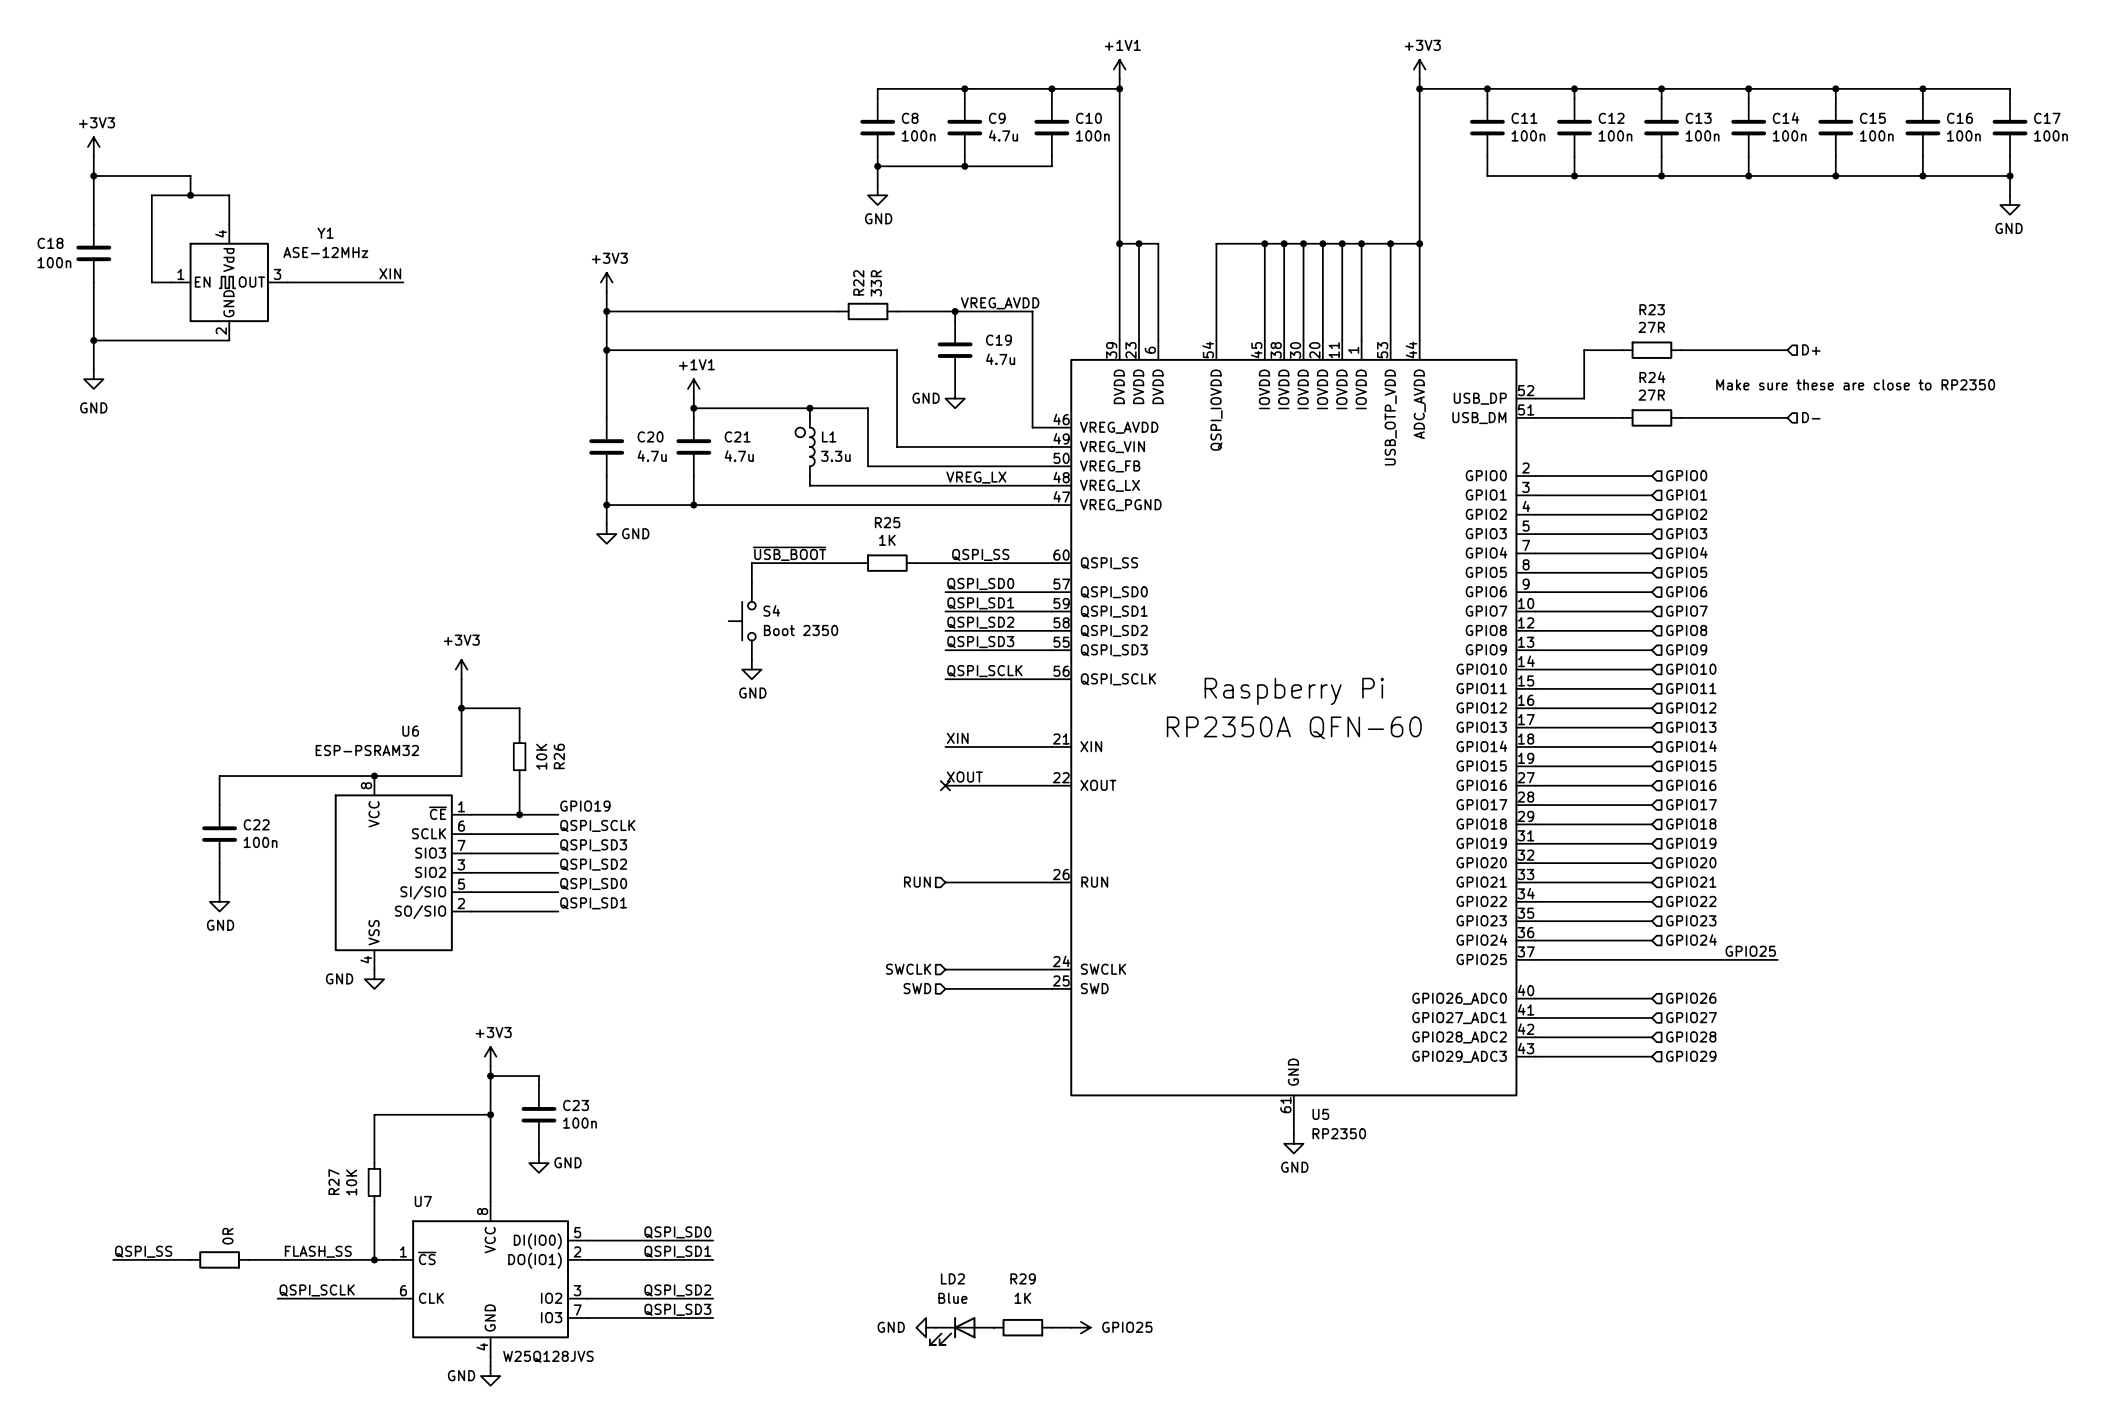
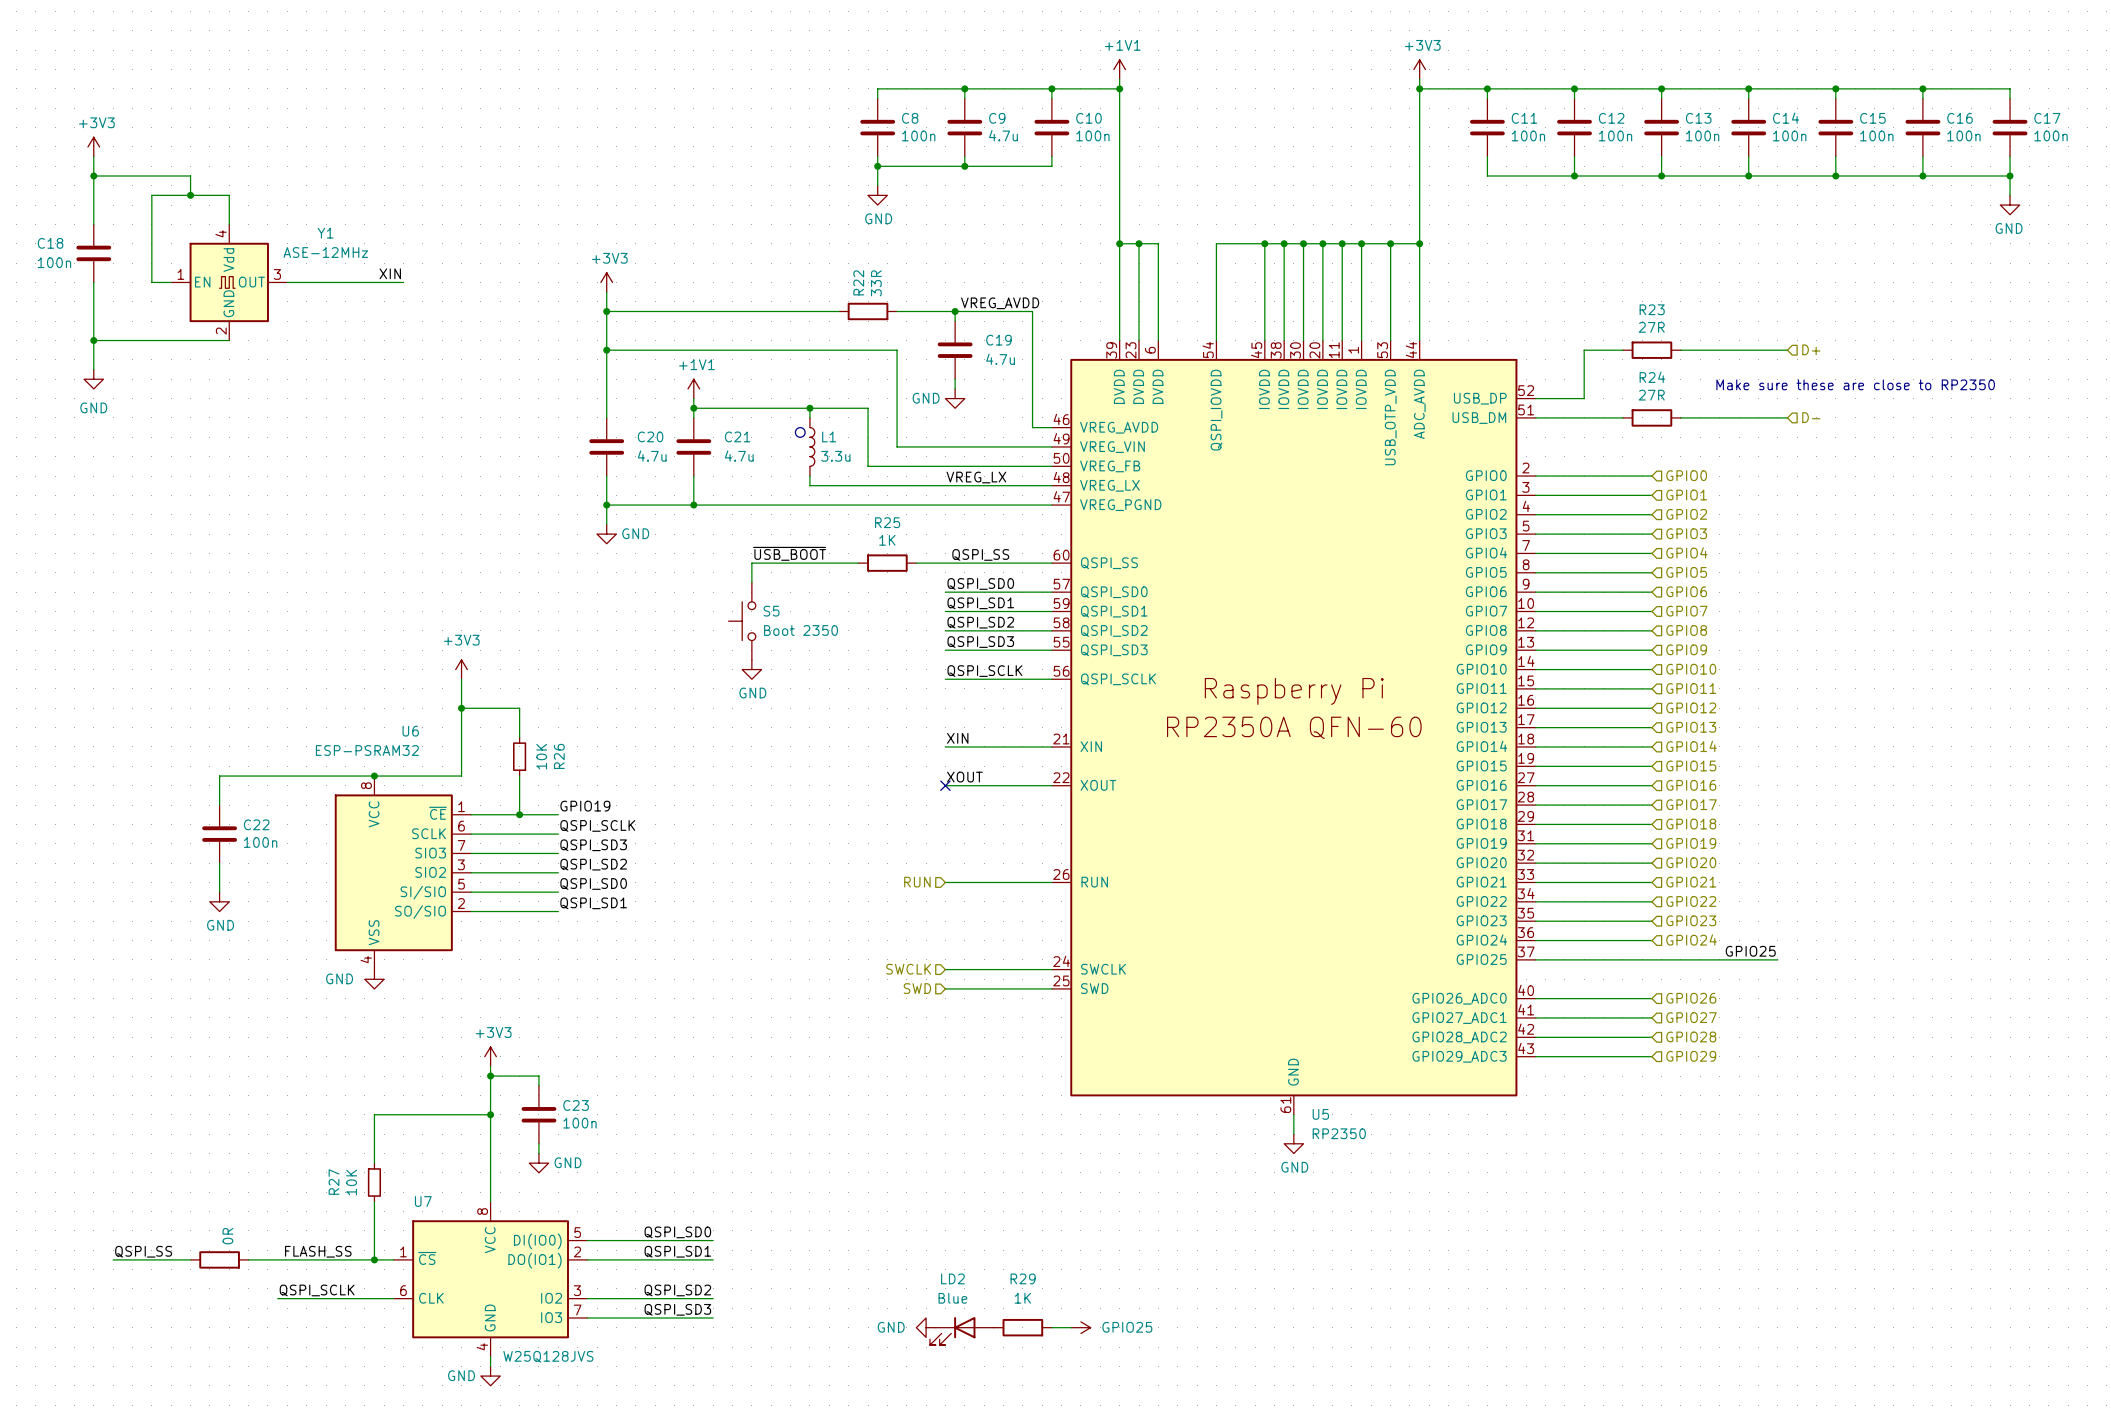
S4 name: S4 (771, 610) -> S5 (771, 611)

